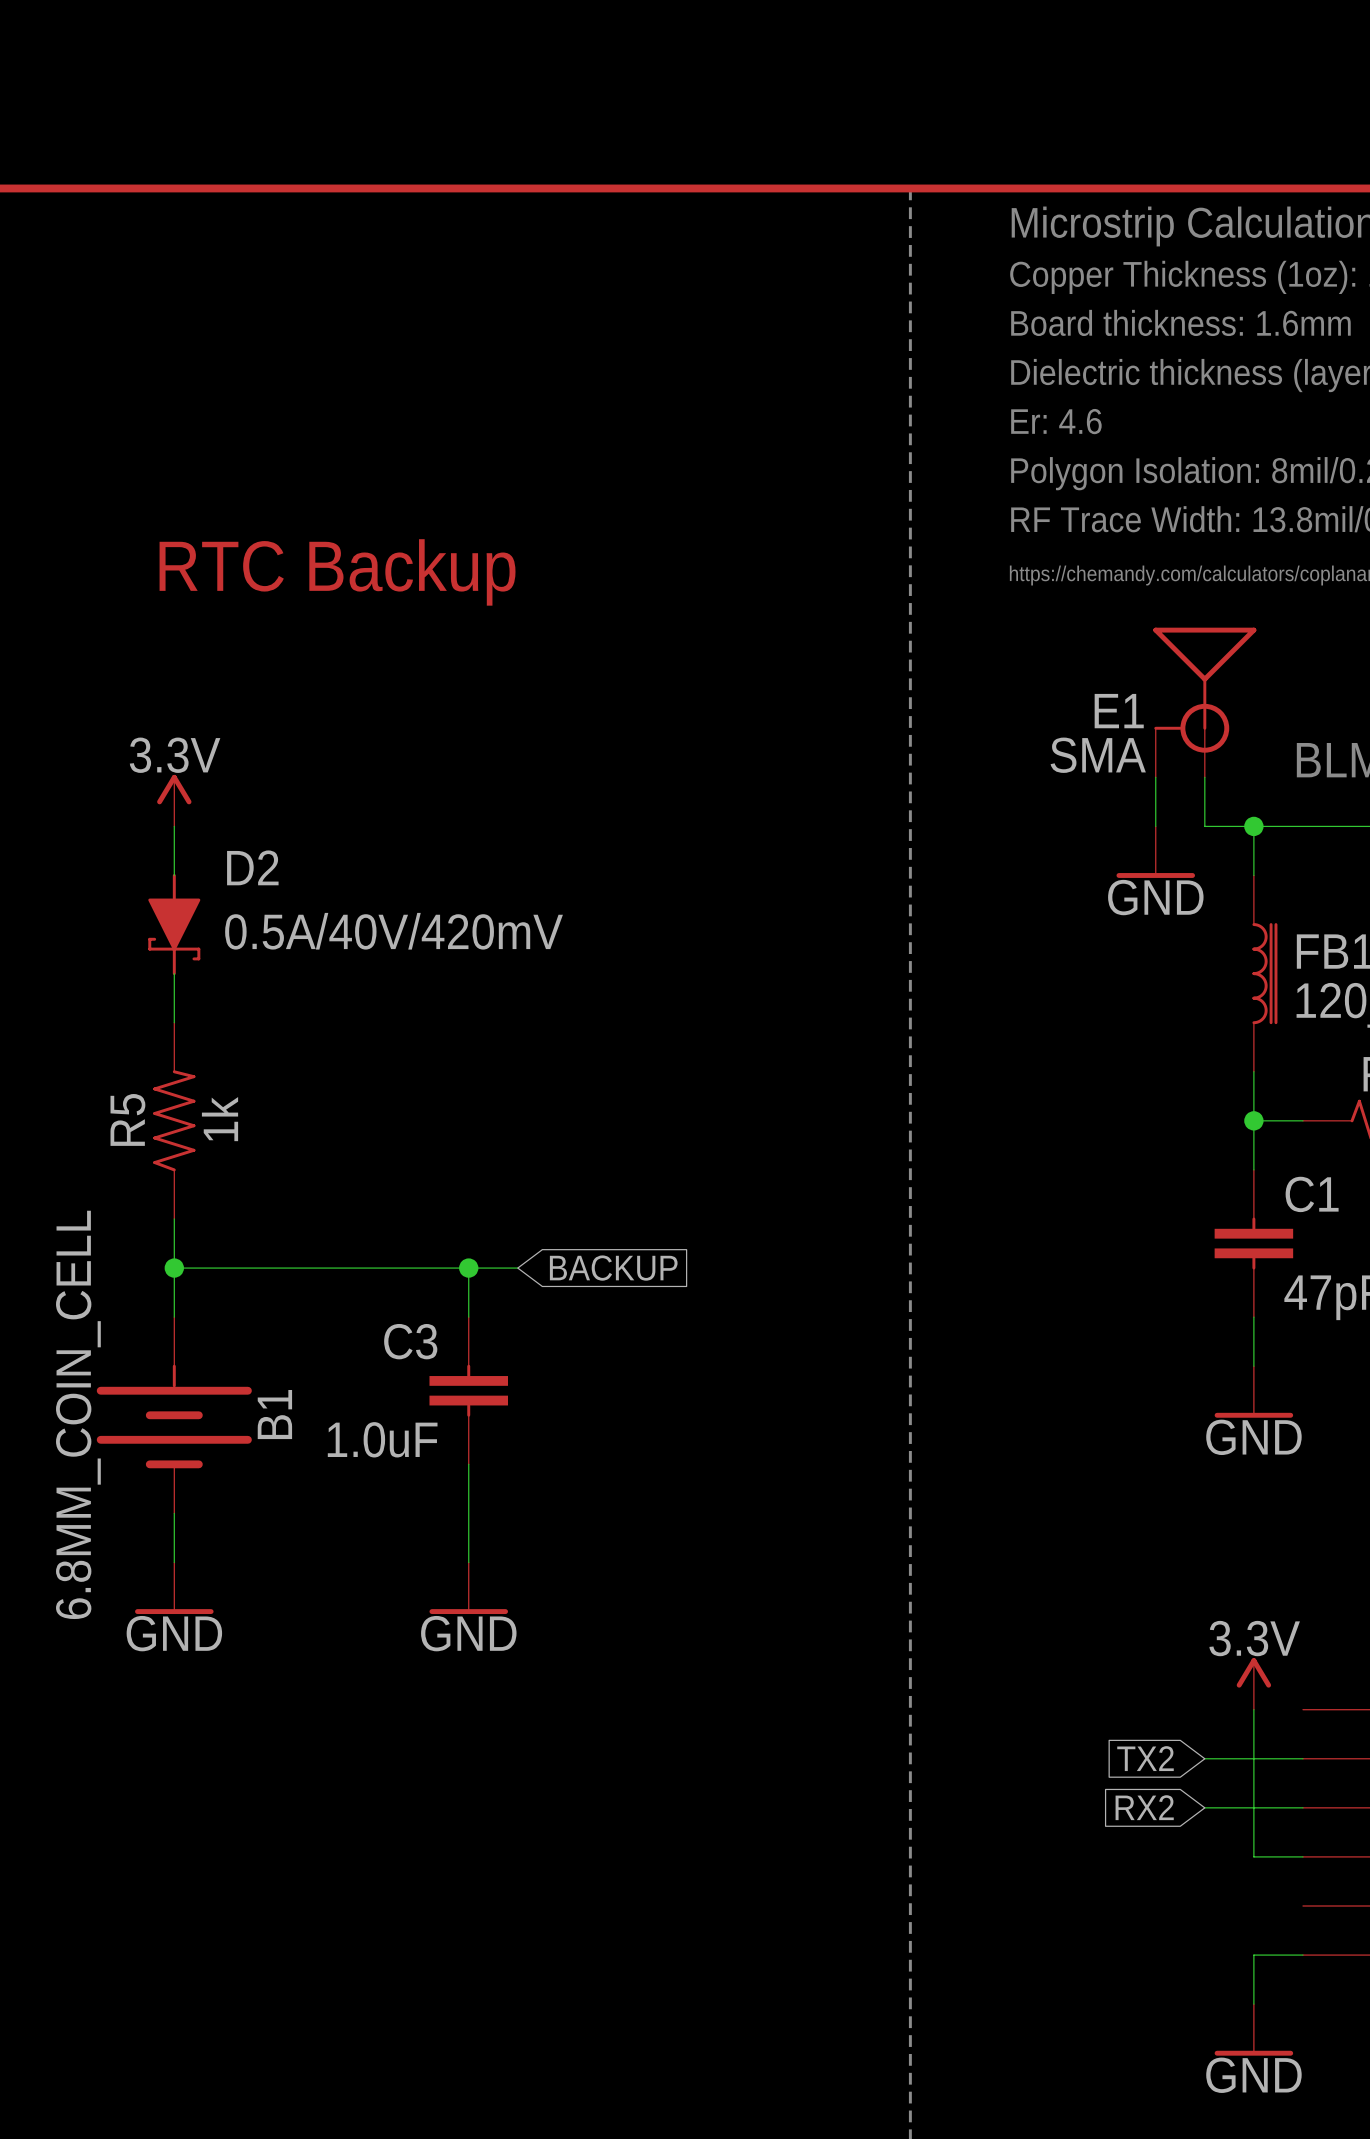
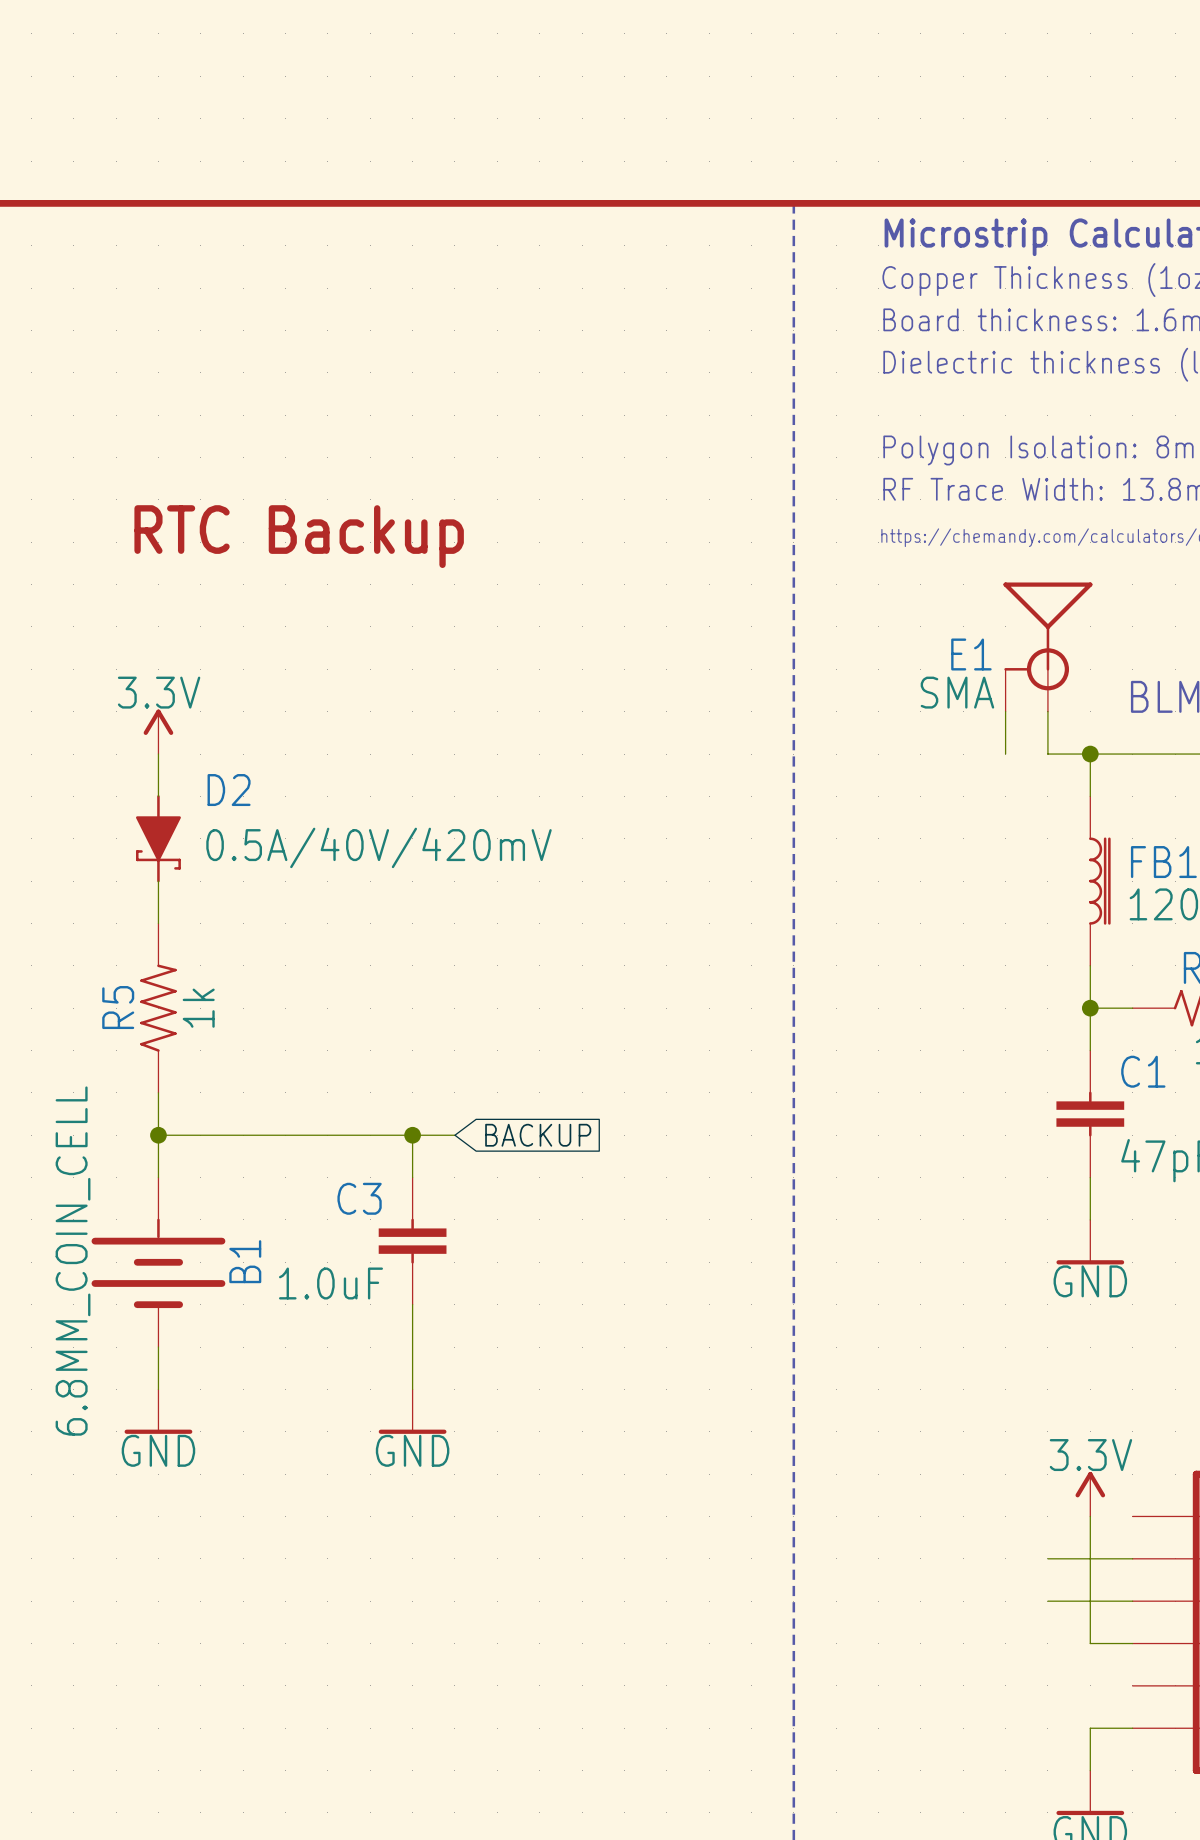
text: Er: 4.6 (1056, 421) -> none
power symbol: GND (1155, 852) -> none
global label: TX2 (1145, 1758) -> none
global label: RX2 (1144, 1807) -> none

